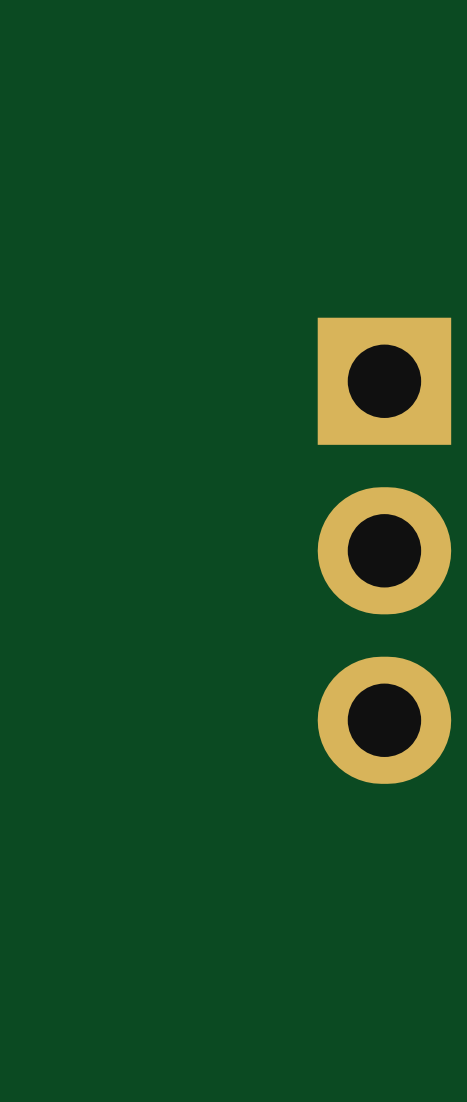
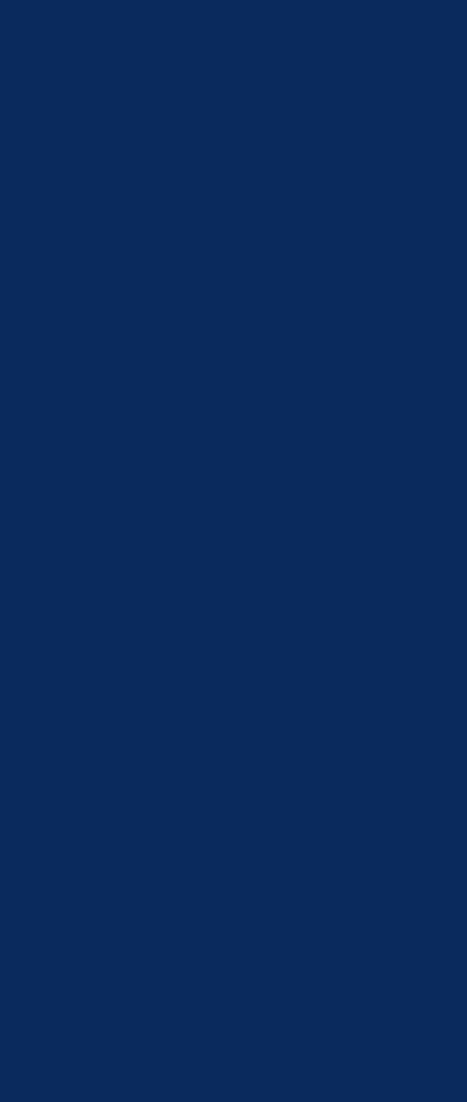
part: (384, 550) -> none

